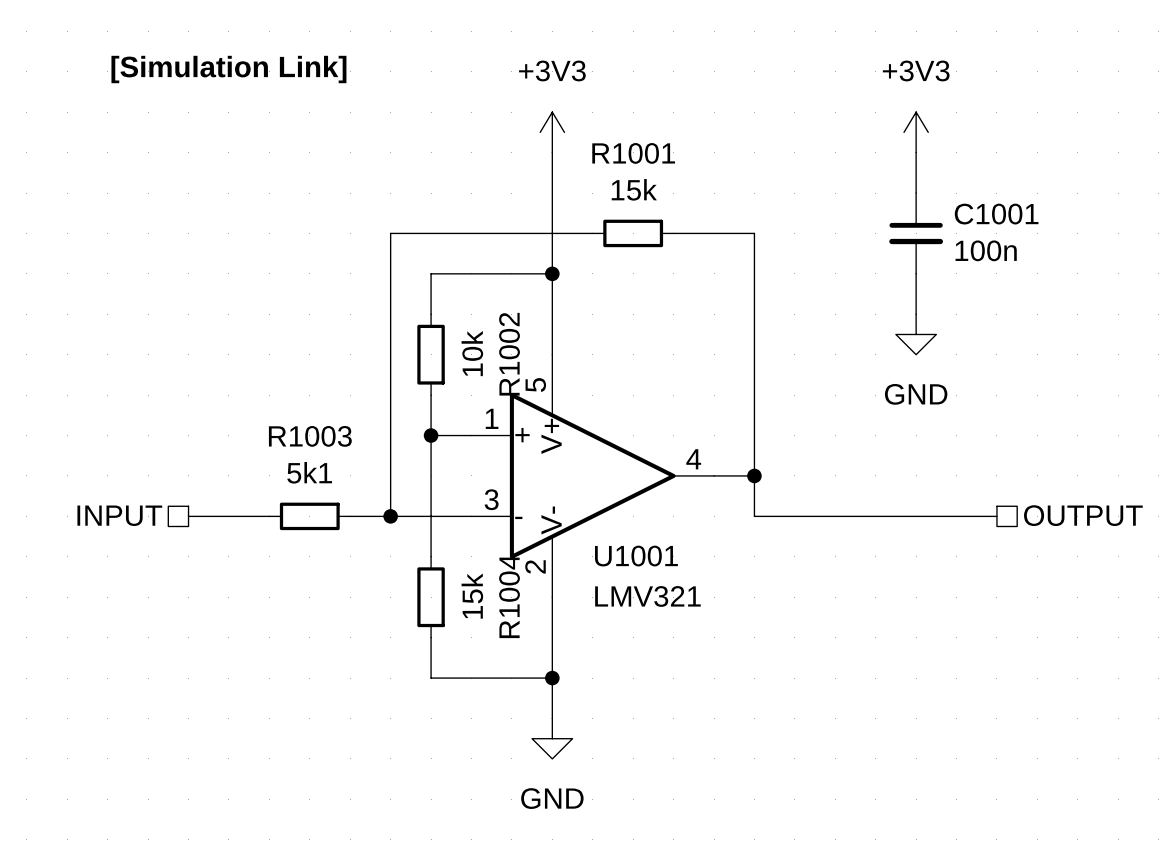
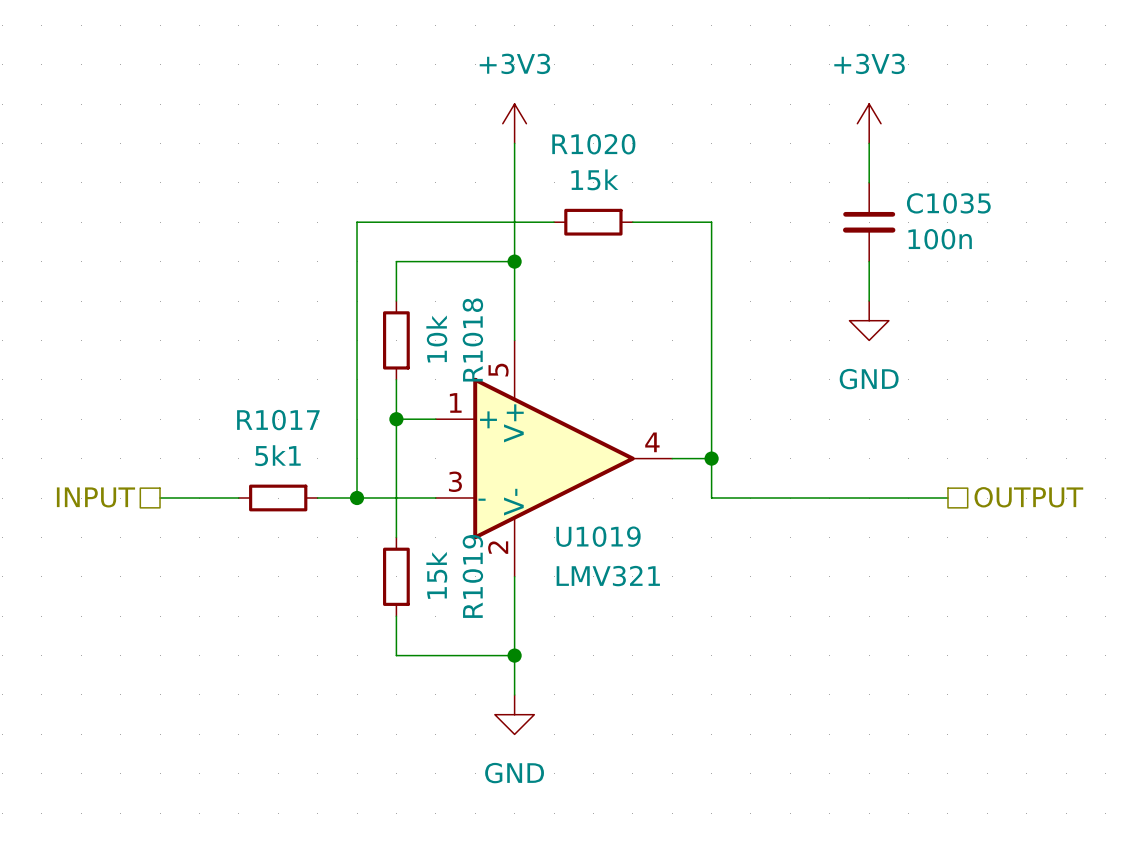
text: [Simulation Link] (228, 69) -> none
R1001 name: R1001 (633, 153) -> R1020 (593, 144)
C1001 name: C1001 (996, 214) -> C1035 (948, 203)
R1002 name: R1002 (509, 354) -> R1018 (472, 340)
R1003 name: R1003 (310, 436) -> R1017 (278, 420)
U1001 name: U1001 (636, 556) -> U1019 (598, 536)
R1004 name: R1004 (509, 596) -> R1019 (472, 576)

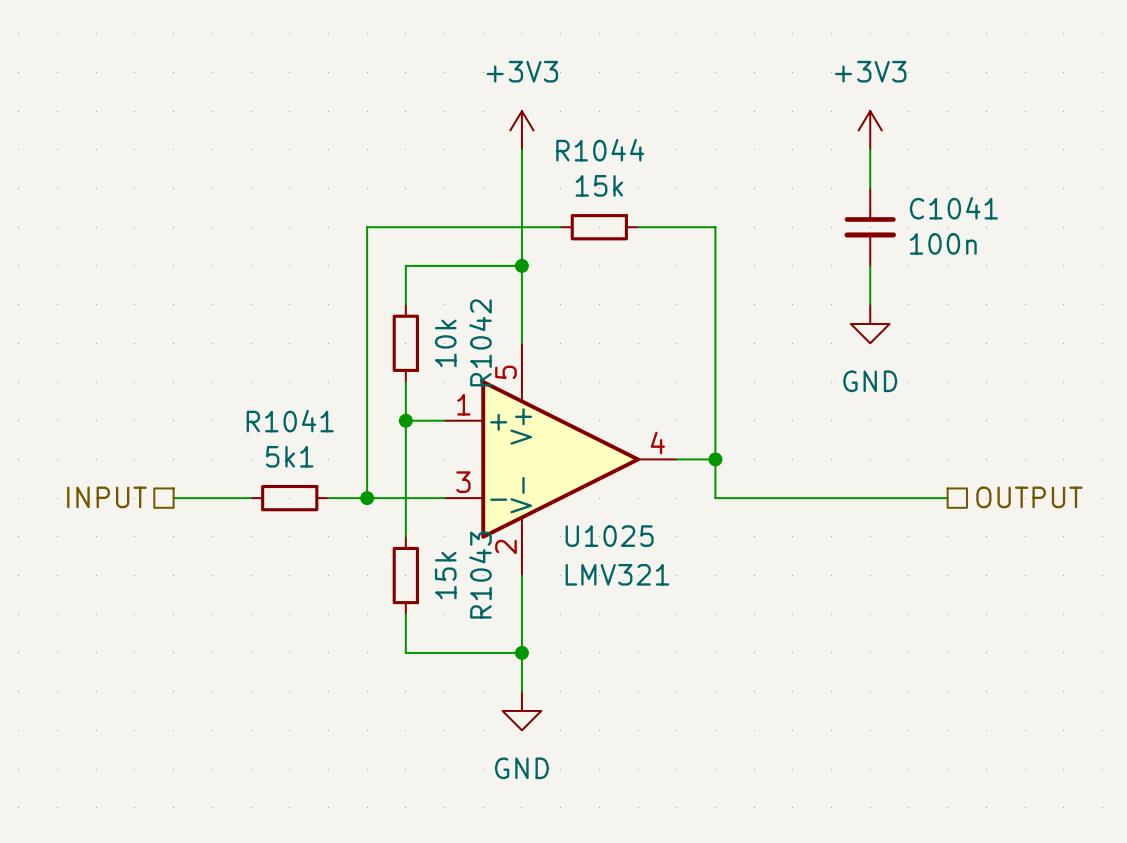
R1020 name: R1020 (593, 144) -> R1044 (600, 150)
C1035 name: C1035 (948, 203) -> C1041 (953, 208)
R1018 name: R1018 (472, 340) -> R1042 (480, 342)
R1017 name: R1017 (278, 420) -> R1041 (290, 421)
U1019 name: U1019 (598, 536) -> U1025 (609, 536)
R1019 name: R1019 (472, 576) -> R1043 (480, 575)

